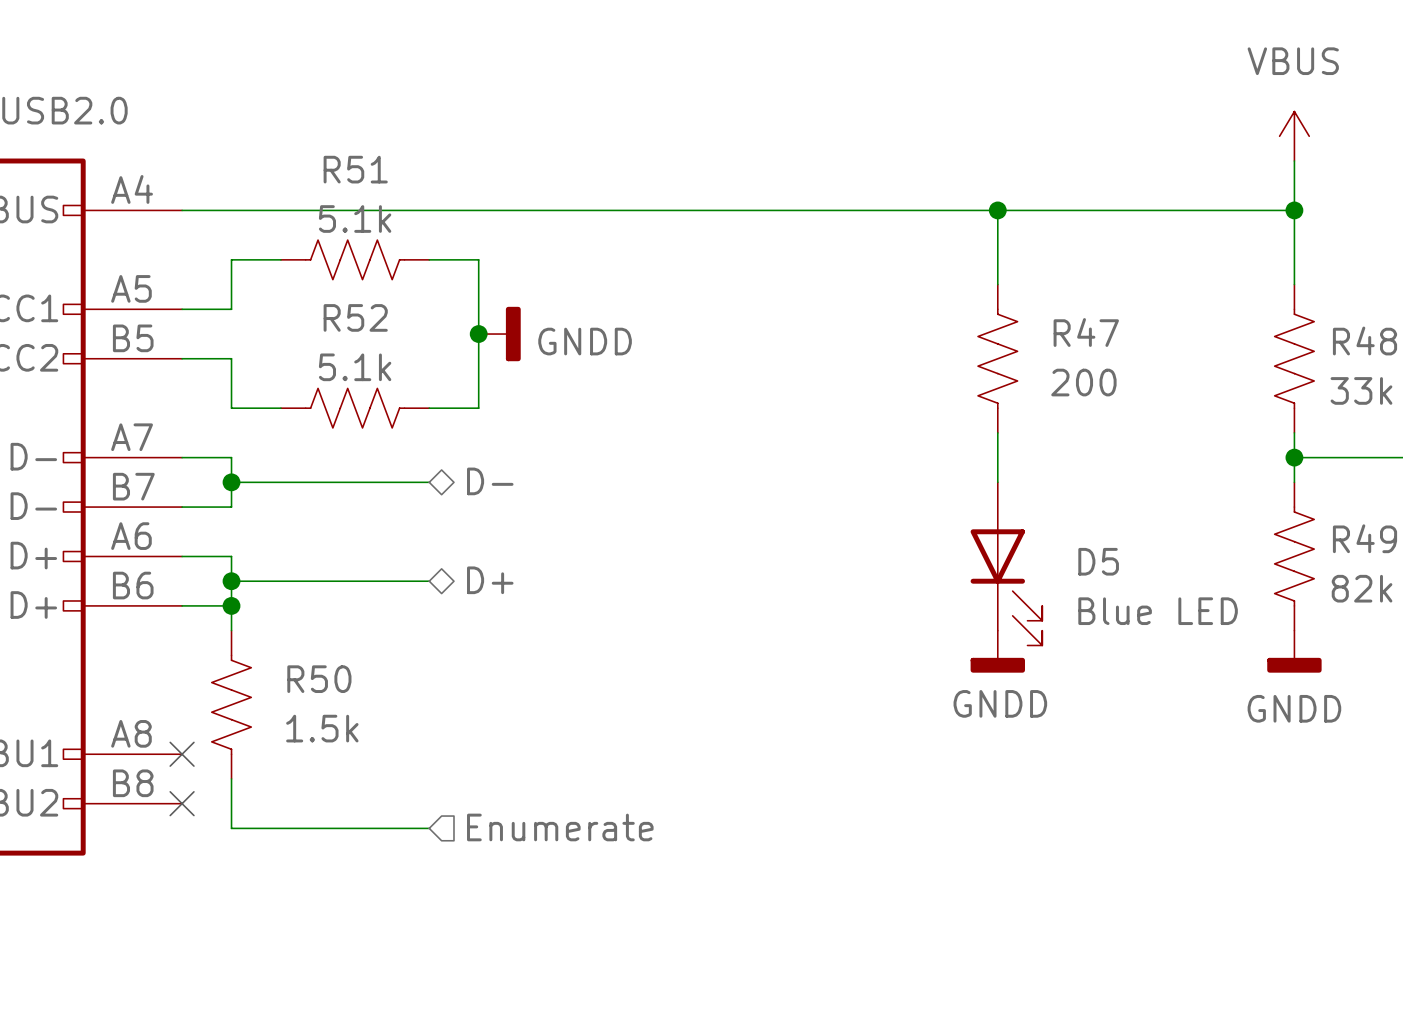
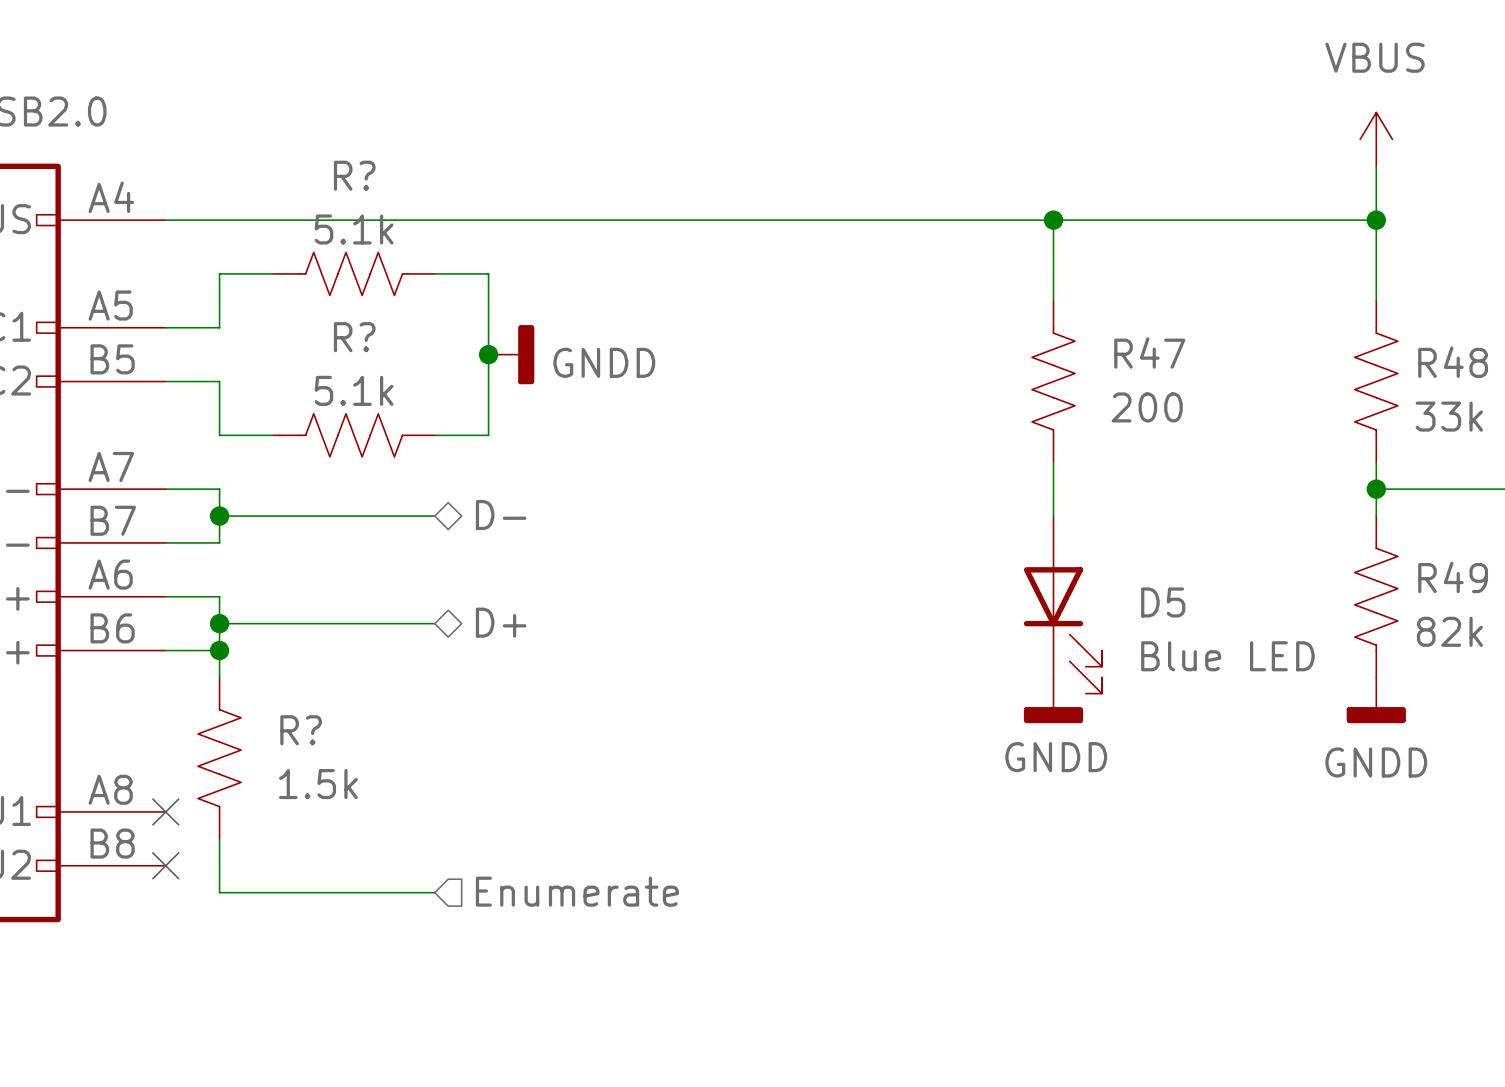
R51 name: R51 (355, 169) -> R? (354, 175)
R52 name: R52 (355, 317) -> R? (354, 337)
R50 name: R50 (319, 679) -> R? (301, 730)

